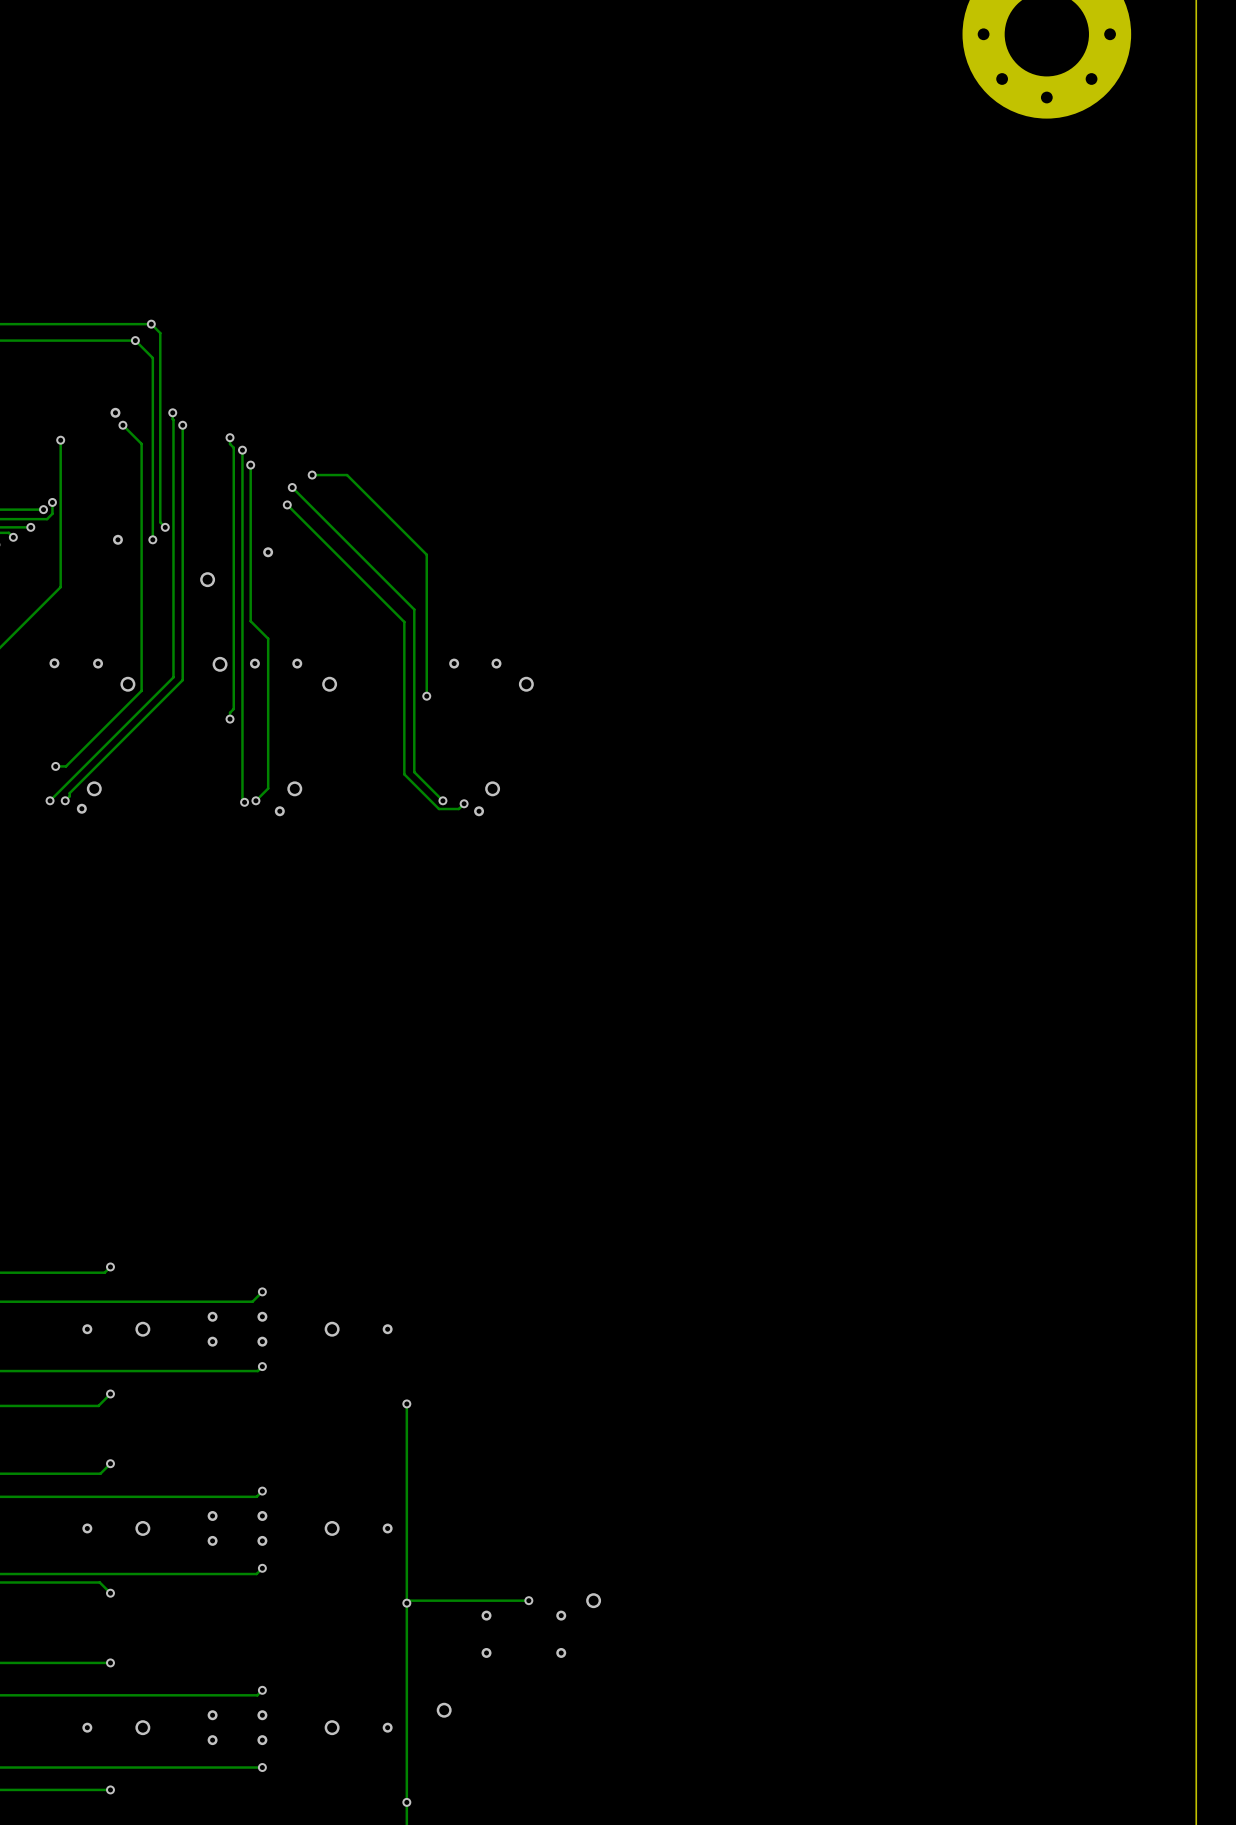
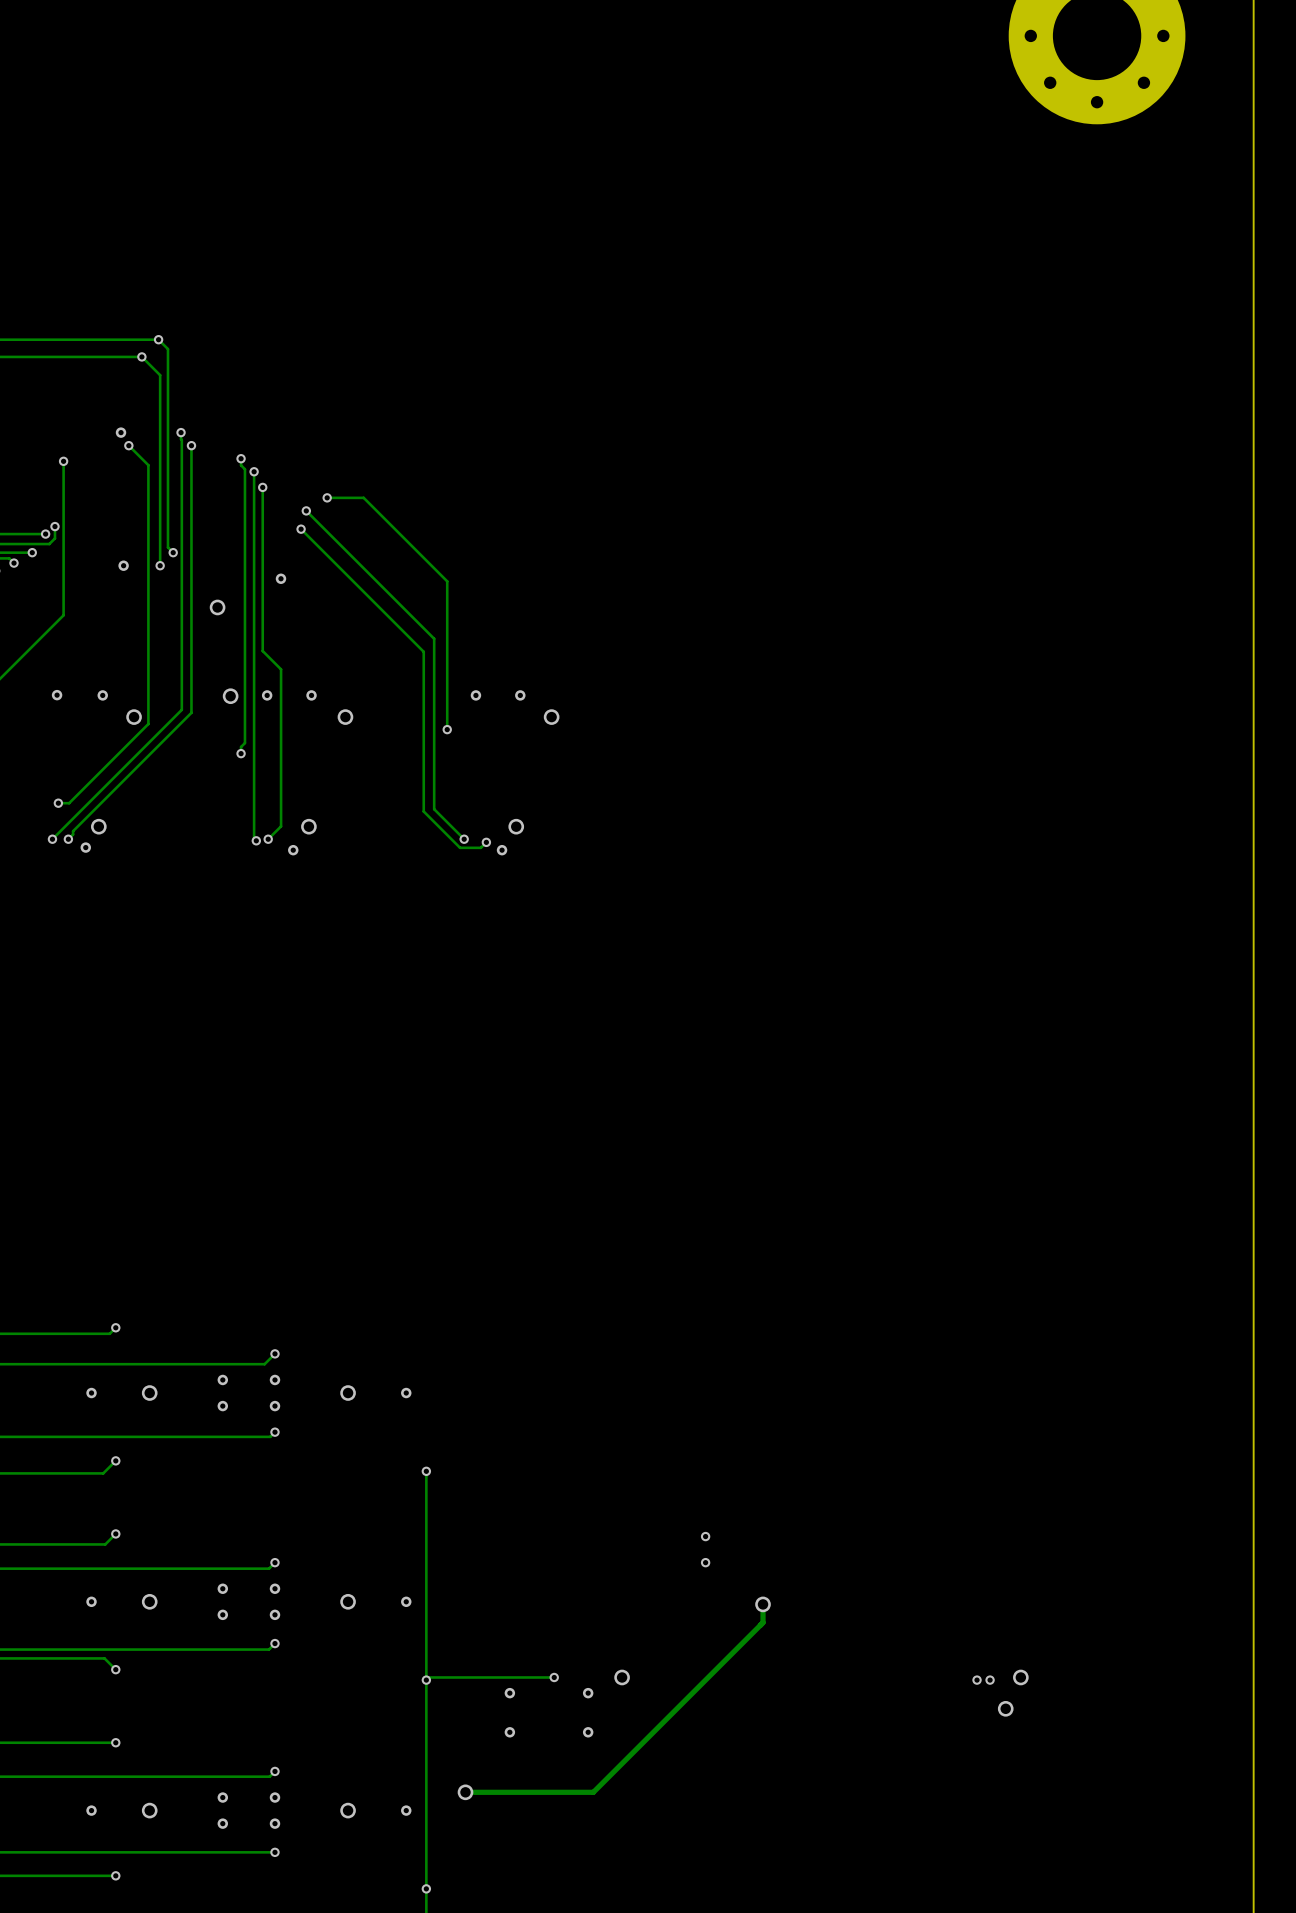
via: none -> (705, 1536)
via: none -> (705, 1562)
track: none -> (763, 1604) (763, 1622) (593, 1792) (465, 1792)
via: none -> (763, 1604)
via: none -> (1020, 1677)
via: none -> (977, 1680)
via: none -> (990, 1680)
via: none -> (1005, 1708)

